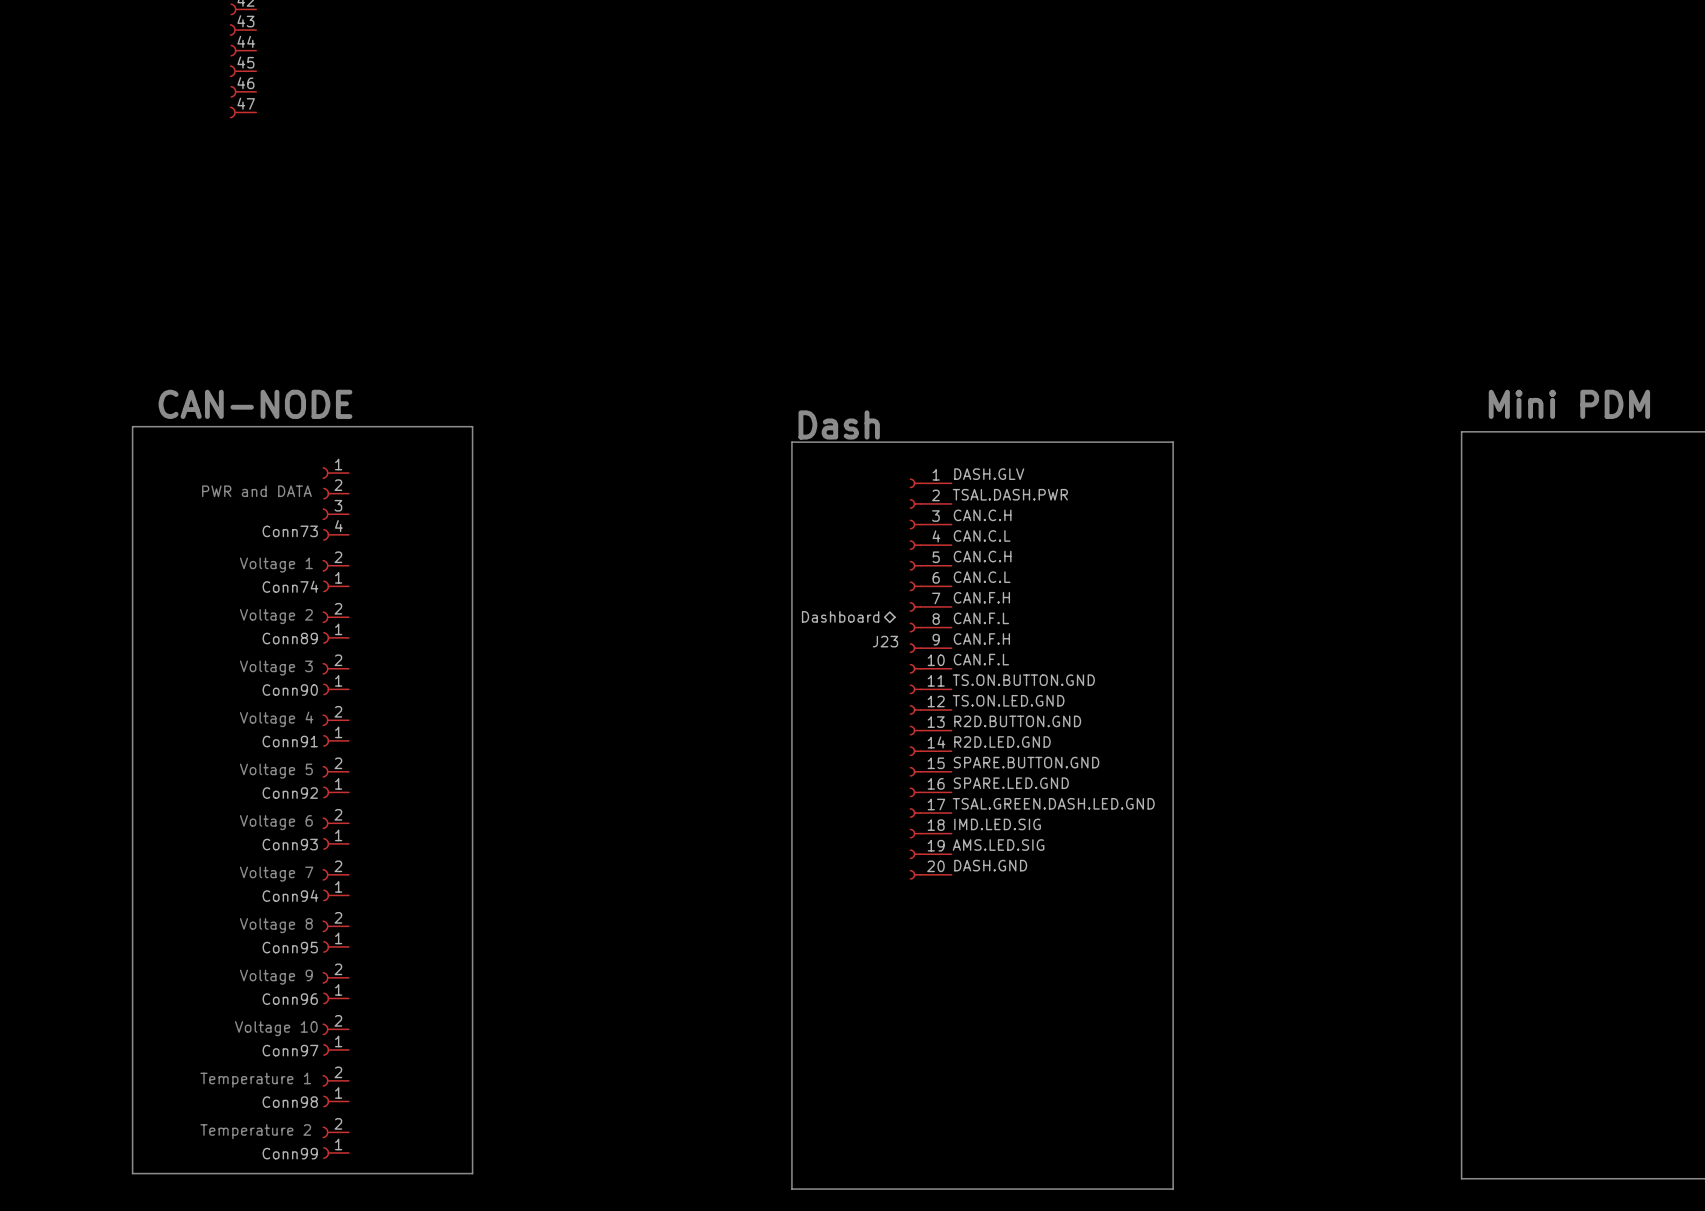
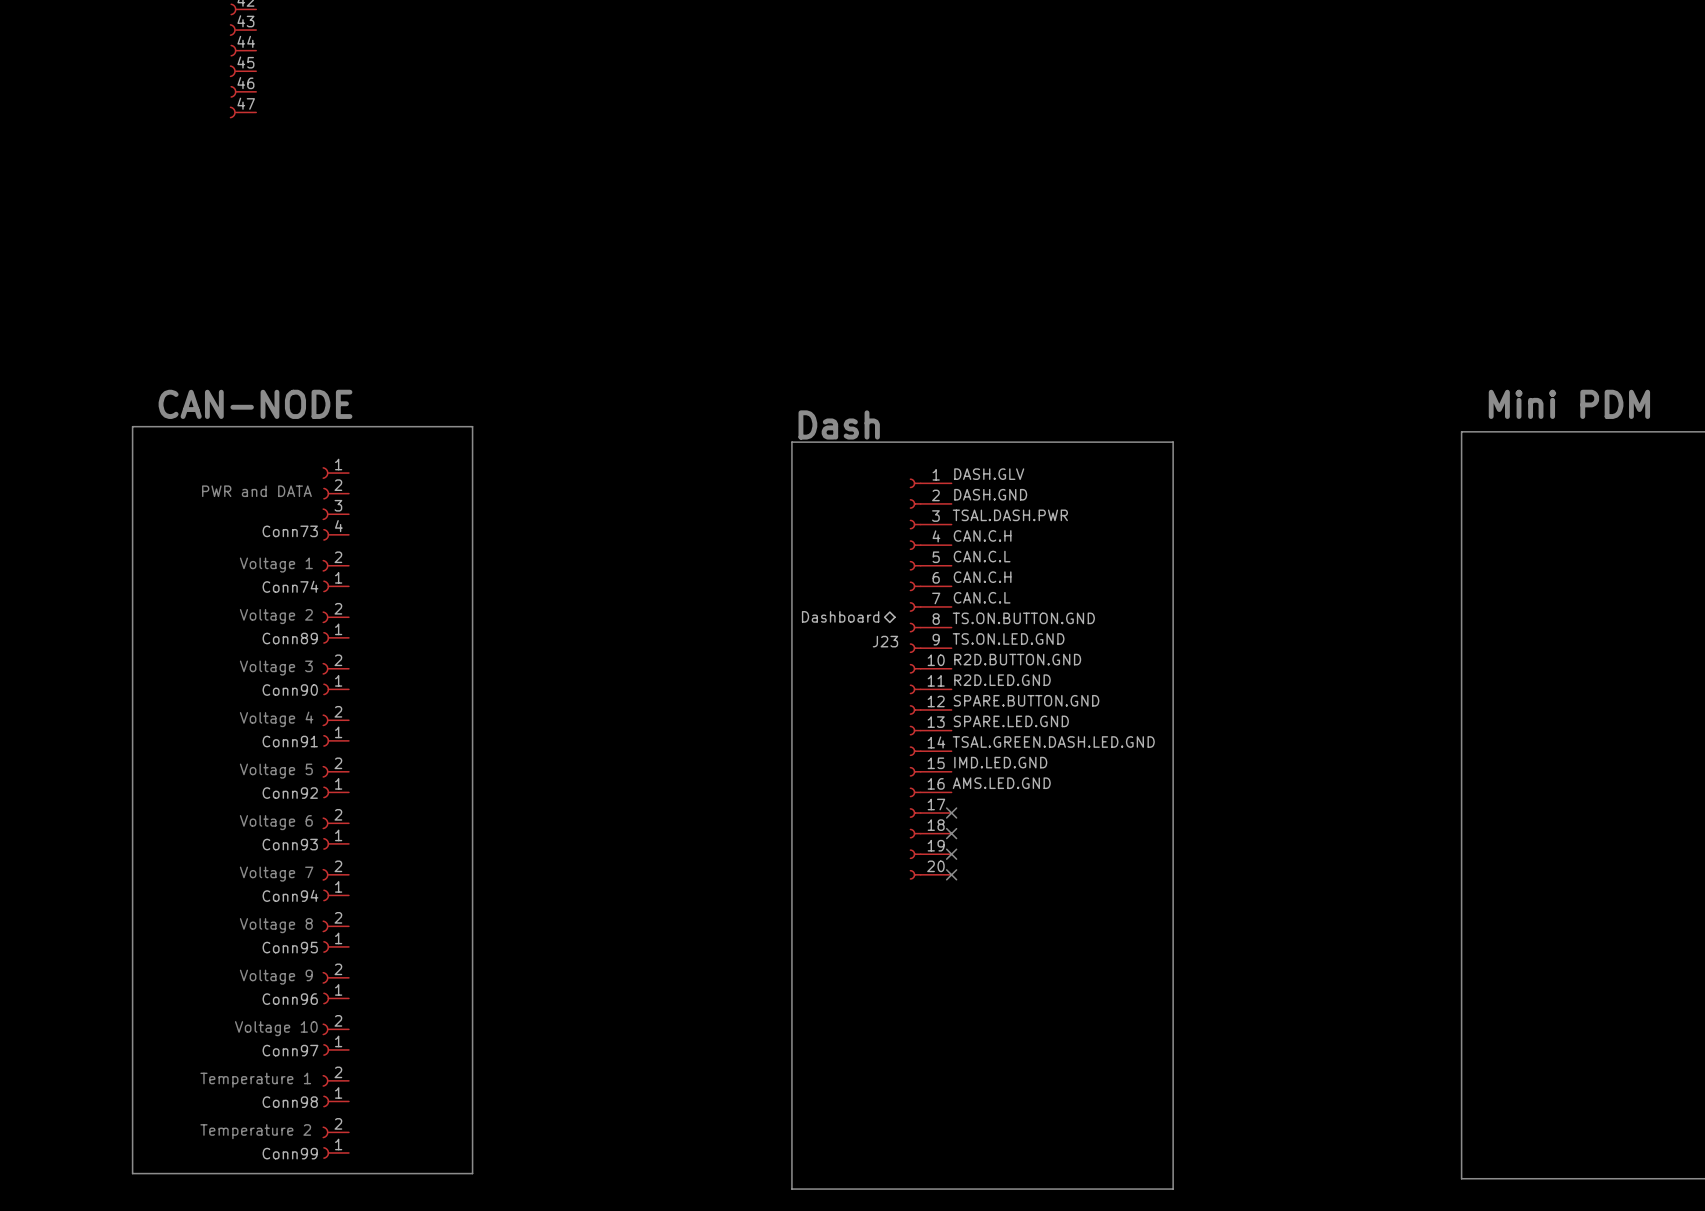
label: TSAL.DASH.PWR (1010, 494) -> DASH.GND (990, 494)
label: CAN.C.H (982, 515) -> TSAL.DASH.PWR (1010, 515)
label: CAN.C.L (982, 535) -> CAN.C.H (982, 535)
label: CAN.C.H (982, 556) -> CAN.C.L (982, 556)
label: CAN.C.L (982, 577) -> CAN.C.H (982, 577)
label: CAN.F.H (981, 597) -> CAN.C.L (982, 597)
label: CAN.F.L (981, 618) -> TS.ON.BUTTON.GND (1023, 618)
label: CAN.F.H (981, 638) -> TS.ON.LED.GND (1008, 638)
label: CAN.F.L (981, 659) -> R2D.BUTTON.GND (1017, 659)
label: TS.ON.BUTTON.GND (1023, 680) -> R2D.LED.GND (1002, 680)
label: TS.ON.LED.GND (1008, 700) -> SPARE.BUTTON.GND (1026, 700)
label: R2D.BUTTON.GND (1017, 721) -> SPARE.LED.GND (1011, 721)
label: R2D.LED.GND (1002, 742) -> TSAL.GREEN.DASH.LED.GND (1053, 742)
label: SPARE.BUTTON.GND (1026, 762) -> IMD.LED.GND (1000, 762)
label: SPARE.LED.GND (1011, 783) -> AMS.LED.GND (1001, 783)
label: TSAL.GREEN.DASH.LED.GND (1053, 803) -> none
no-connect mark: none -> (951, 813)
label: IMD.LED.SIG (997, 824) -> none
no-connect mark: none -> (951, 833)
label: AMS.LED.SIG (998, 845) -> none
no-connect mark: none -> (951, 854)
label: DASH.GND (990, 865) -> none
no-connect mark: none -> (951, 874)

